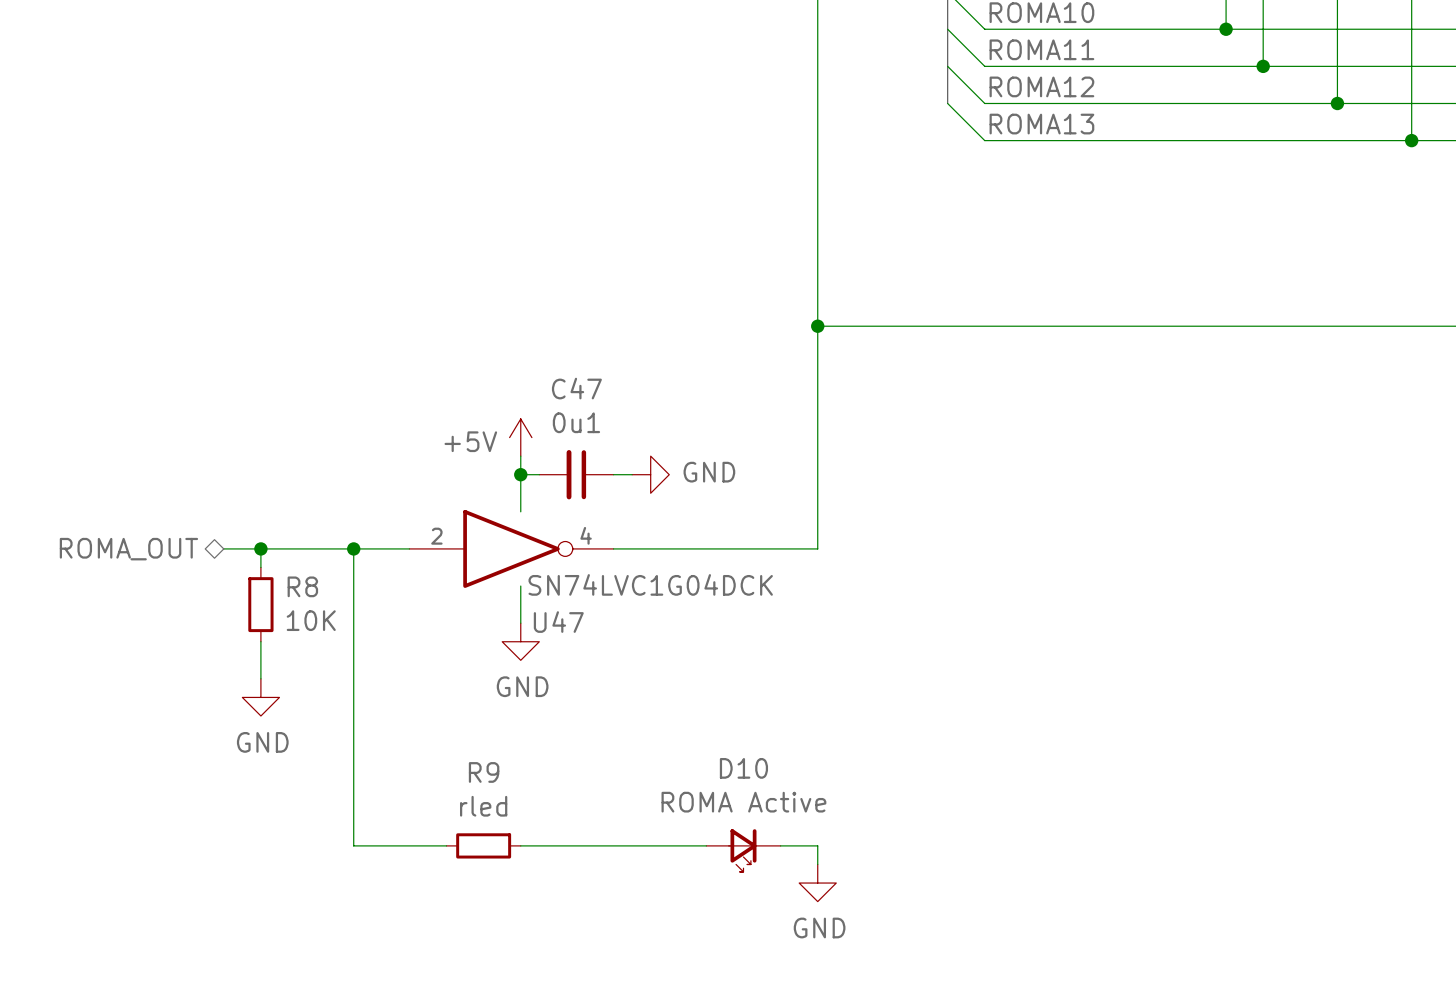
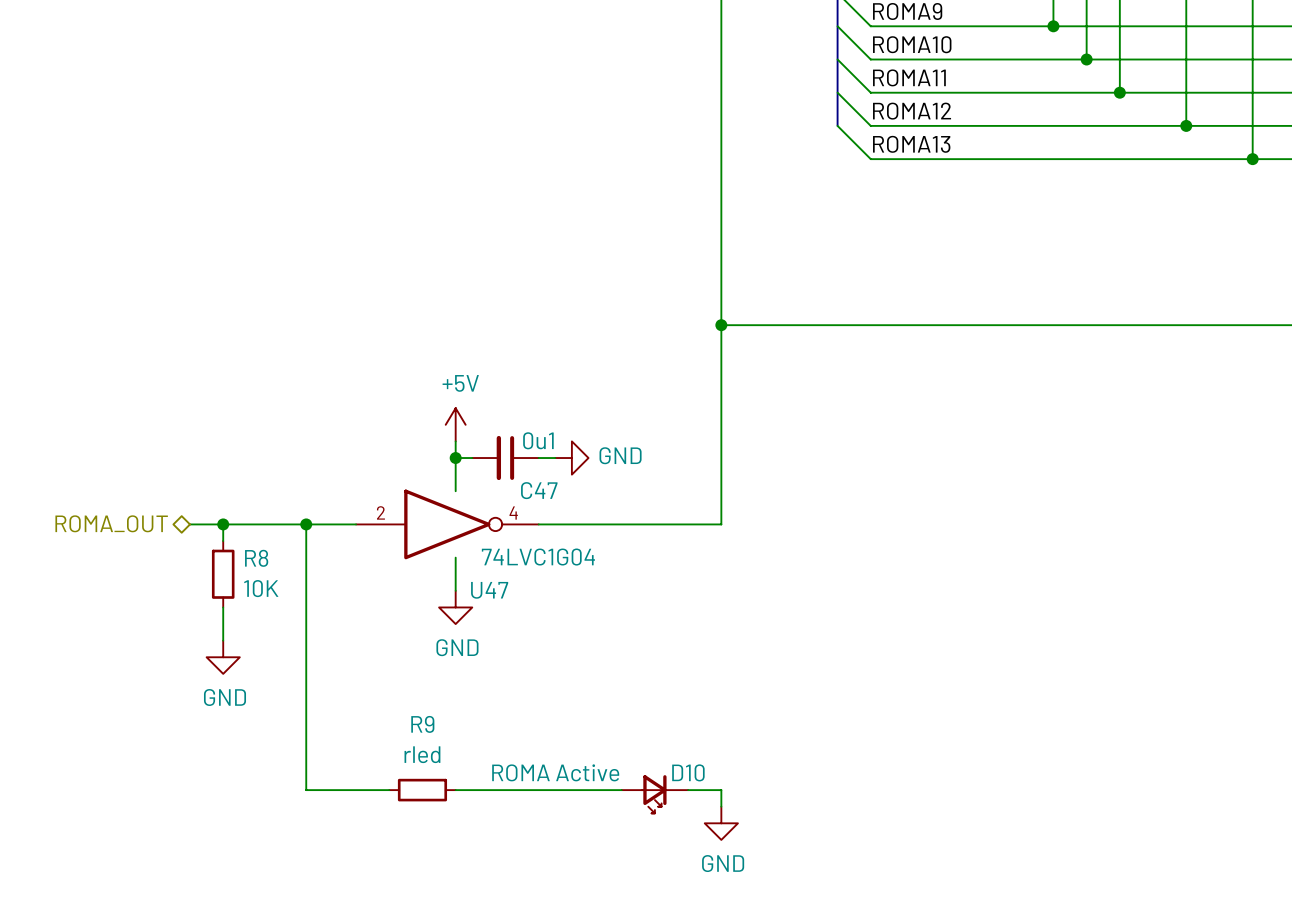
C47 name position: C47 (576, 388) -> C47 (539, 490)
C47 value position: 0u1 (576, 422) -> 0u1 (538, 440)
power symbol text position: +5V (470, 441) -> +5V (460, 383)
U47 value: SN74LVC1G04DCK (650, 584) -> 74LVC1G04 (538, 557)
D10 name position: D10 (743, 768) -> D10 (688, 772)
D10 value position: ROMA Active (743, 802) -> ROMA Active (555, 772)

